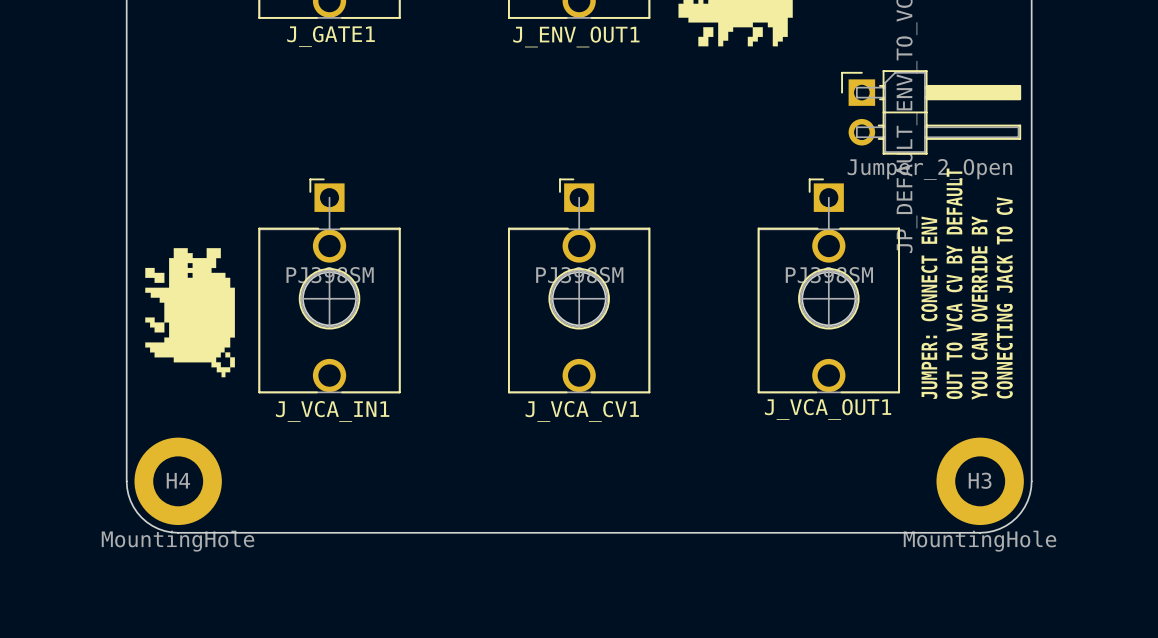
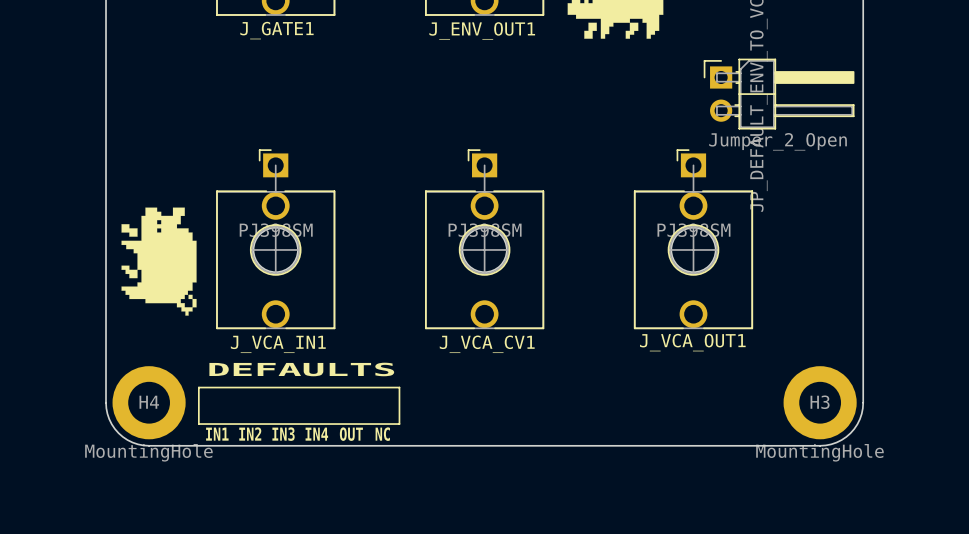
text: OUT TO VCA CV BY DEFAULT (954, 283) -> none
text: CONNECTING JACK TO CV (1004, 297) -> none
text: JUMPER: CONNECT ENV (929, 307) -> none
text: YOU CAN OVERRIDE BY (979, 307) -> none
text: none -> DEFAULTS (301, 369)
line: none -> (198, 387) (399, 387) (399, 424) (198, 424) (198, 387)
text: none -> IN1 (217, 434)
text: none -> IN2 (250, 434)
text: none -> IN3 (283, 434)
text: none -> IN4 (316, 434)
text: none -> OUT (351, 434)
text: none -> NC (382, 434)

